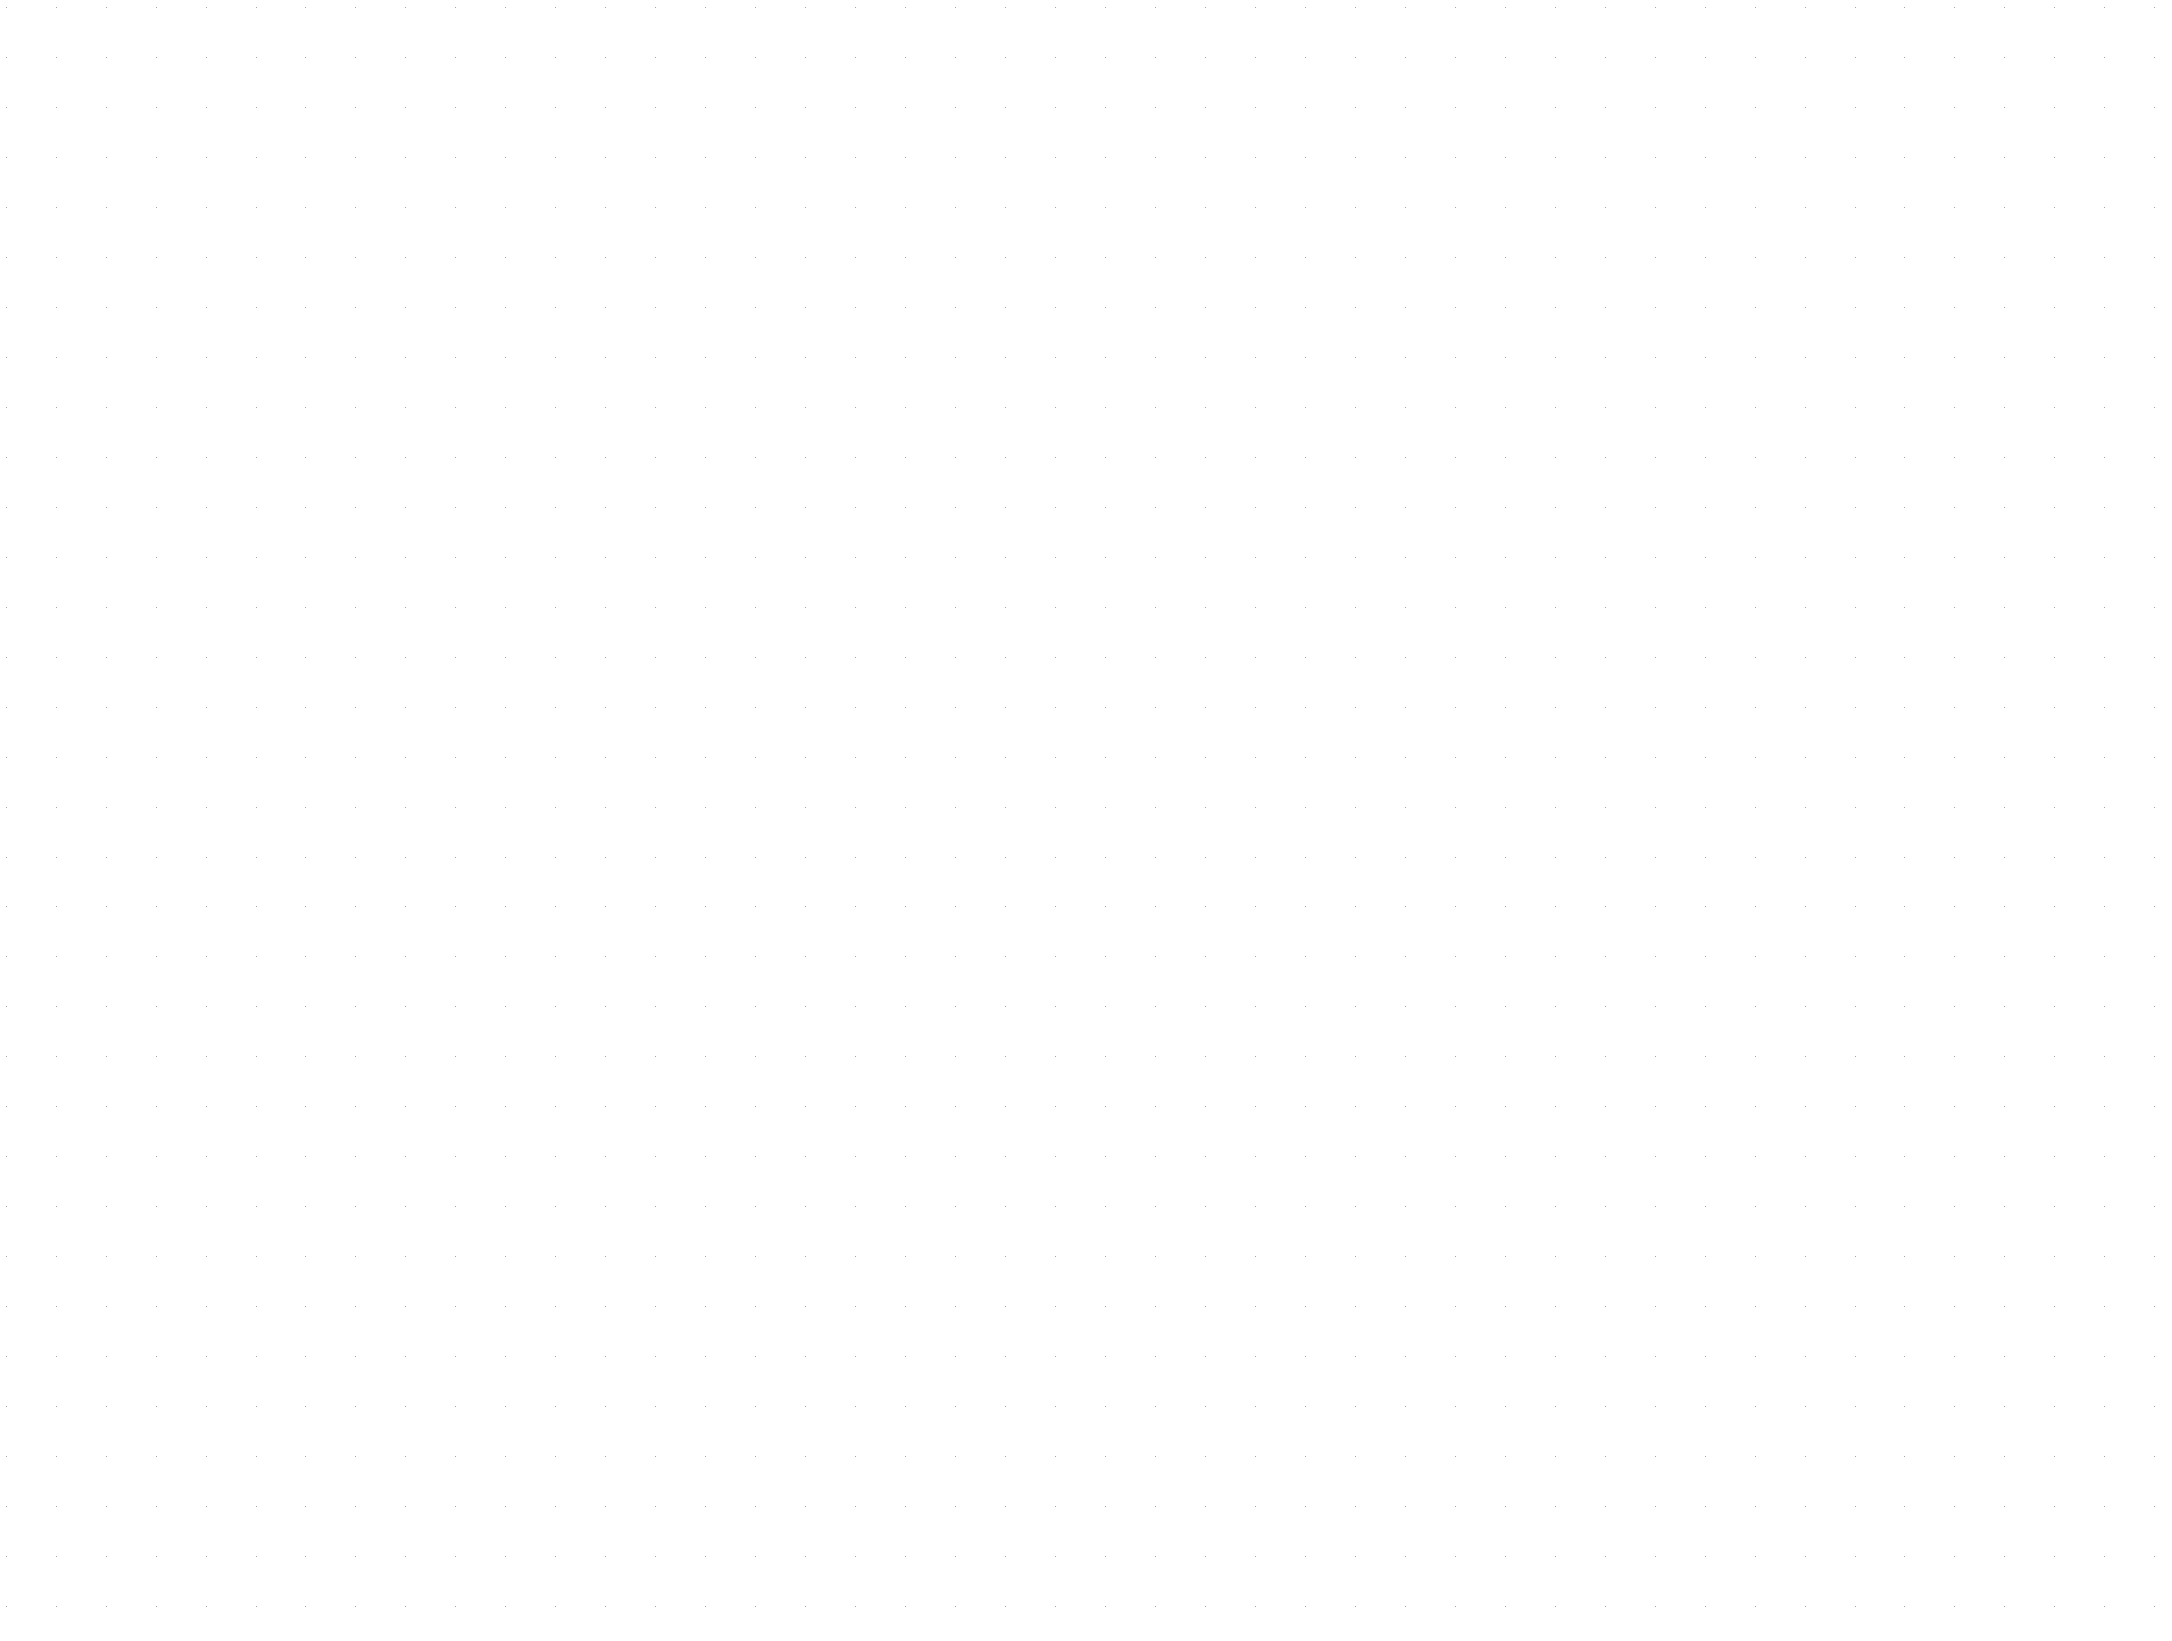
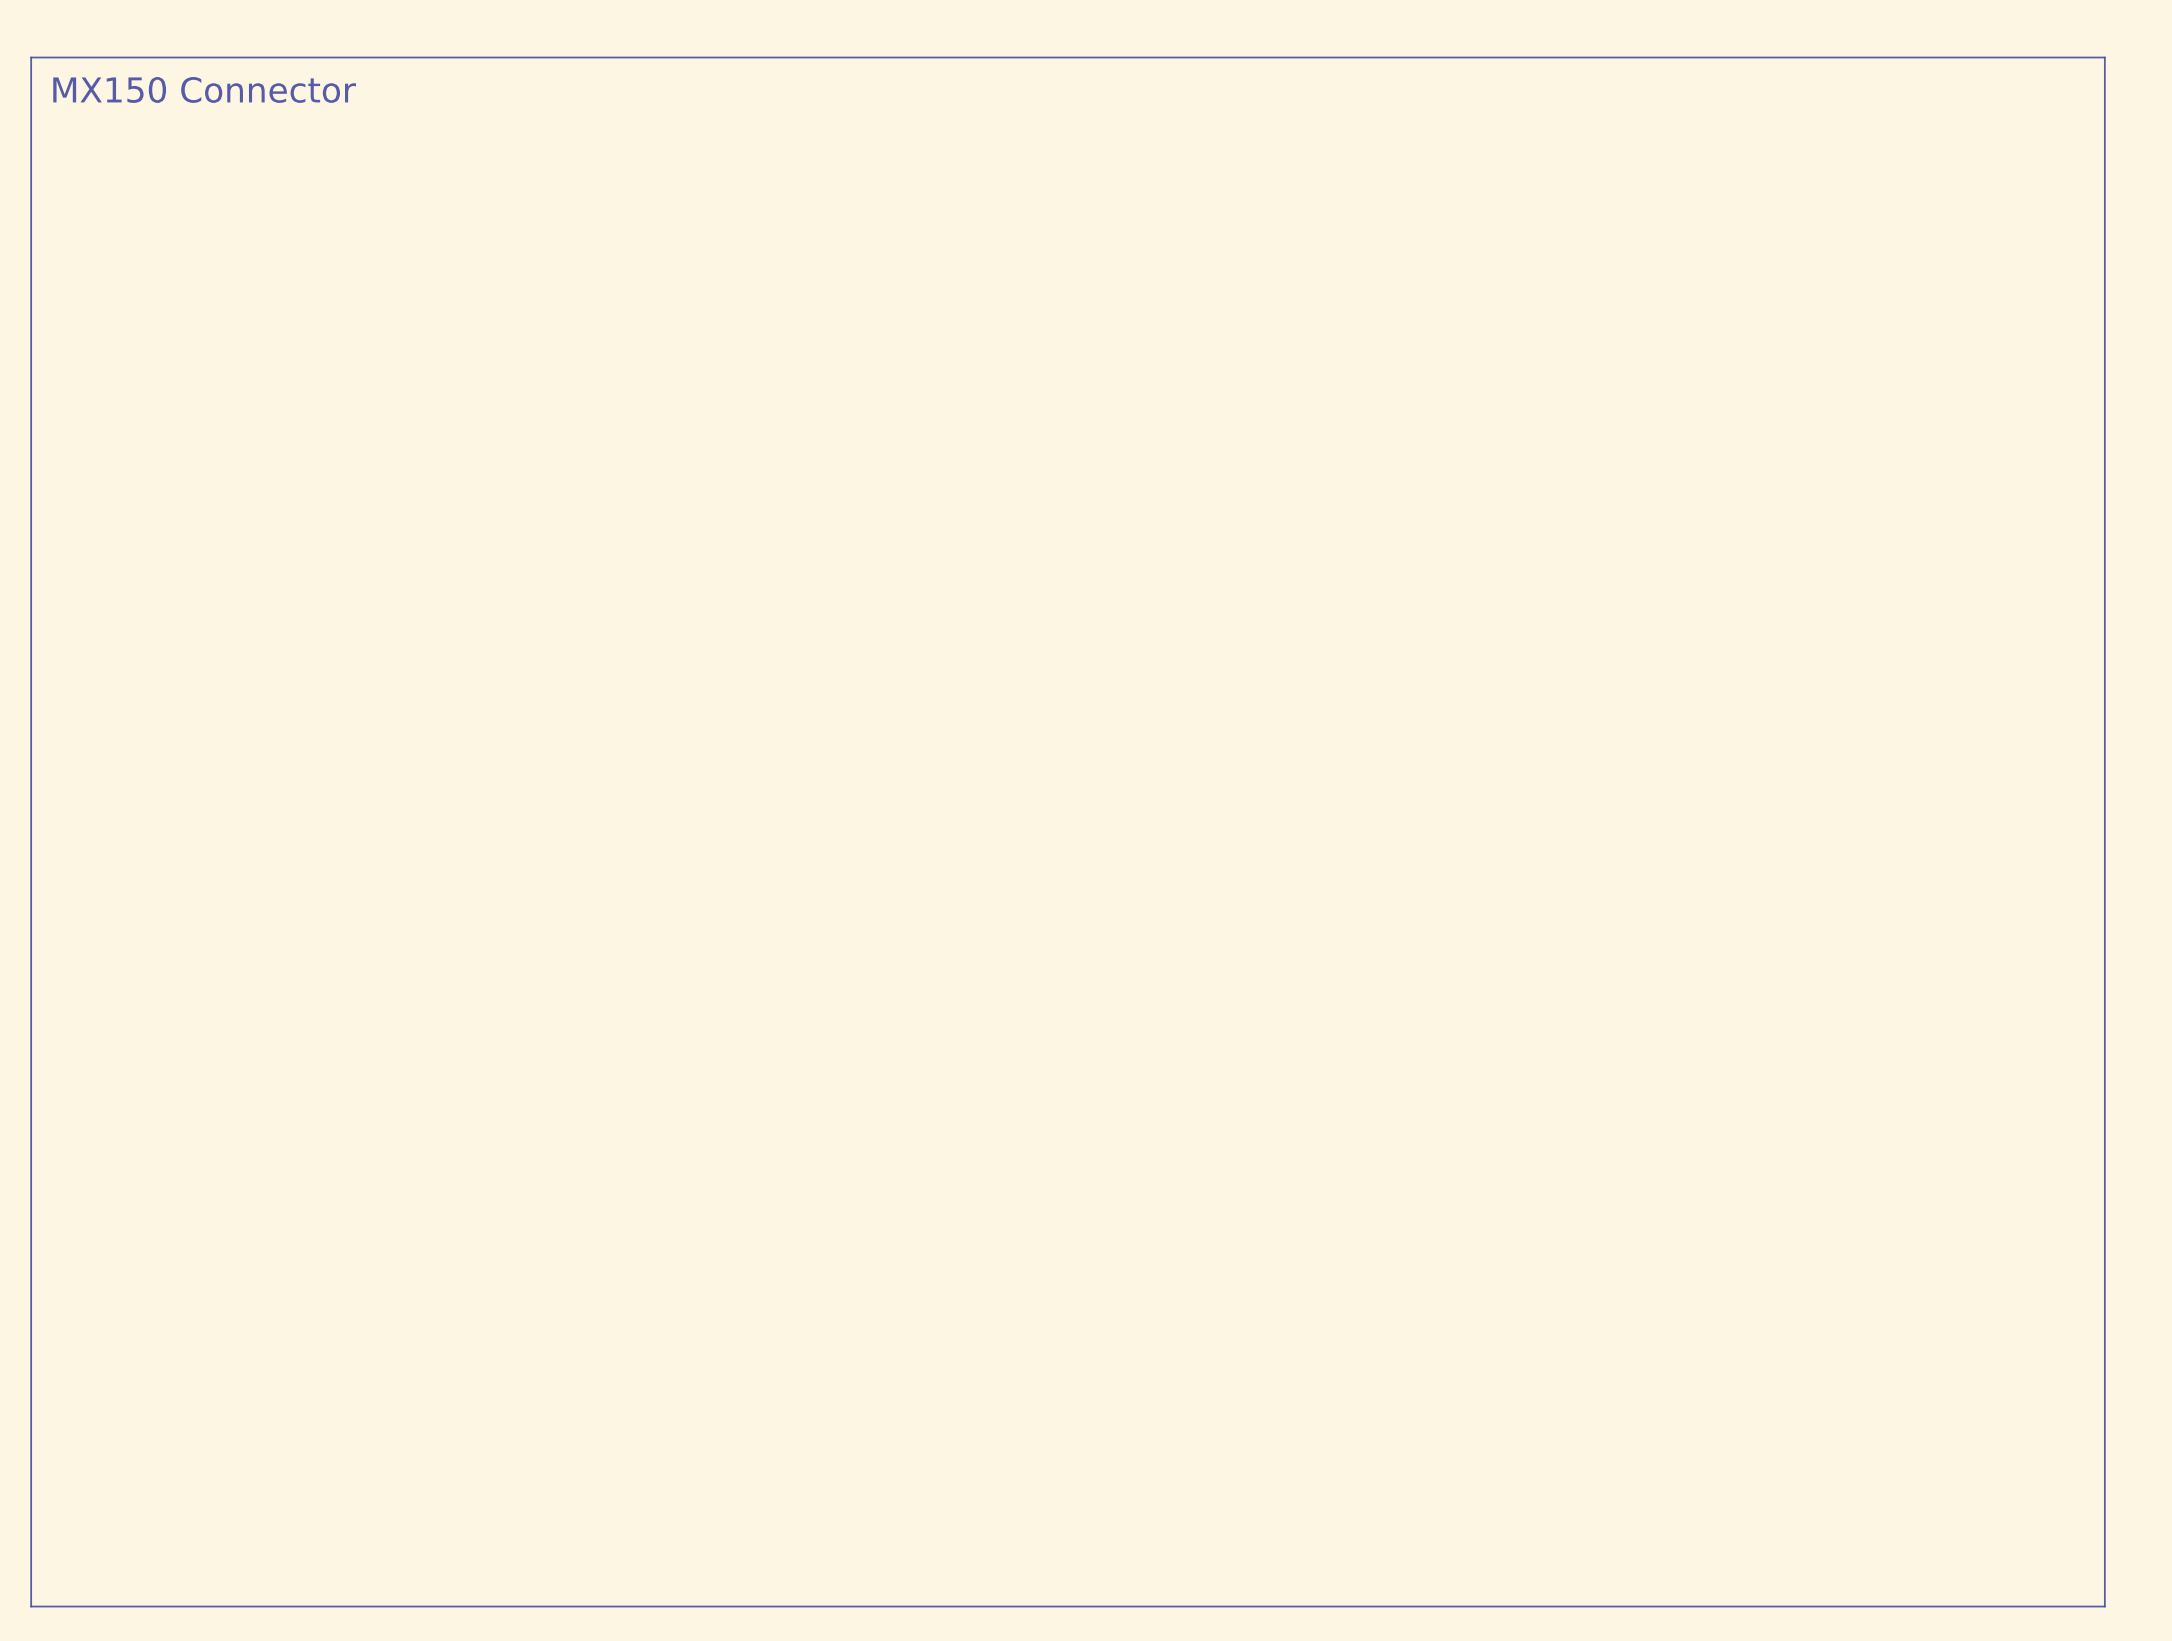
line: none -> (31, 57) (2104, 57) (2104, 1606) (31, 1606) (31, 57)
text: none -> MX150 Connector (204, 89)

